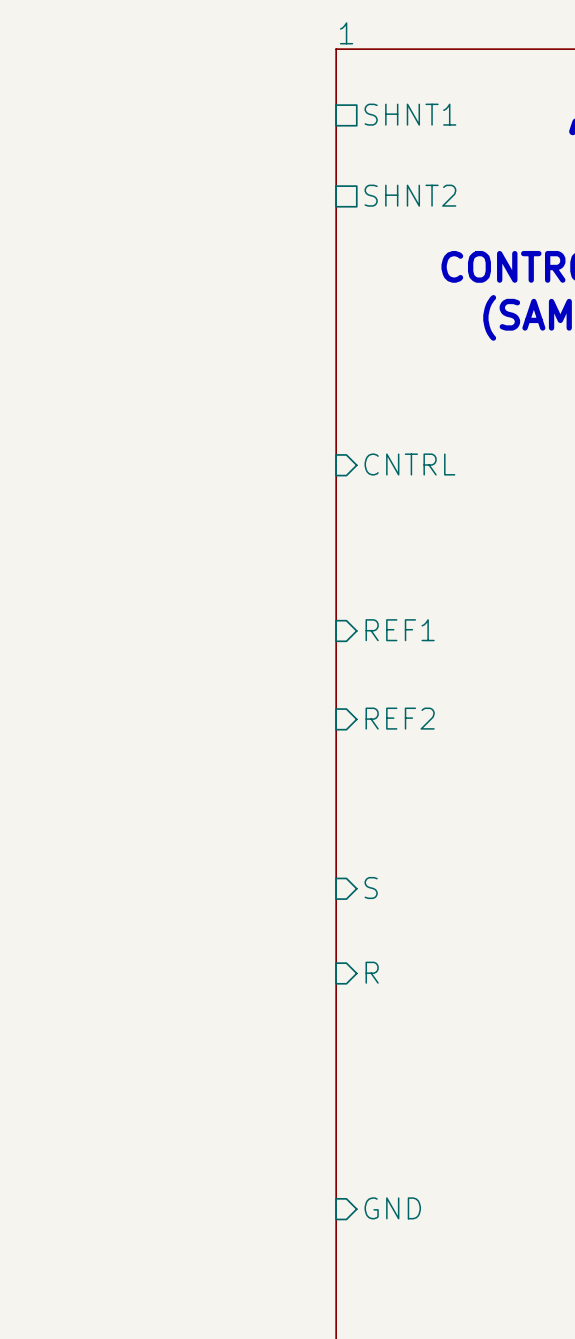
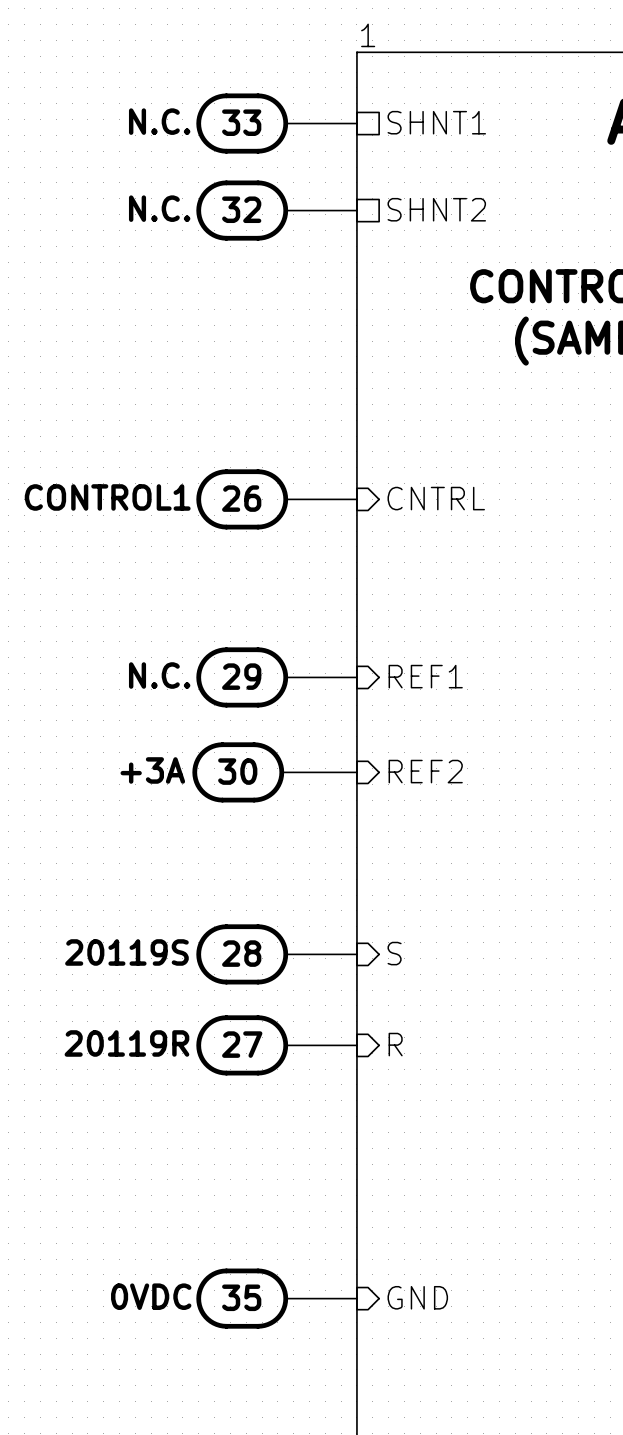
part: none -> (242, 123)
wire: none -> (285, 123) (356, 123)
part: none -> (242, 210)
wire: none -> (285, 210) (356, 210)
part: none -> (242, 499)
wire: none -> (285, 499) (356, 499)
part: none -> (242, 677)
wire: none -> (285, 677) (356, 677)
part: none -> (238, 772)
wire: none -> (281, 772) (356, 772)
part: none -> (242, 954)
wire: none -> (285, 954) (356, 954)
part: none -> (242, 1045)
wire: none -> (285, 1045) (356, 1045)
part: none -> (242, 1298)
wire: none -> (285, 1298) (356, 1298)

